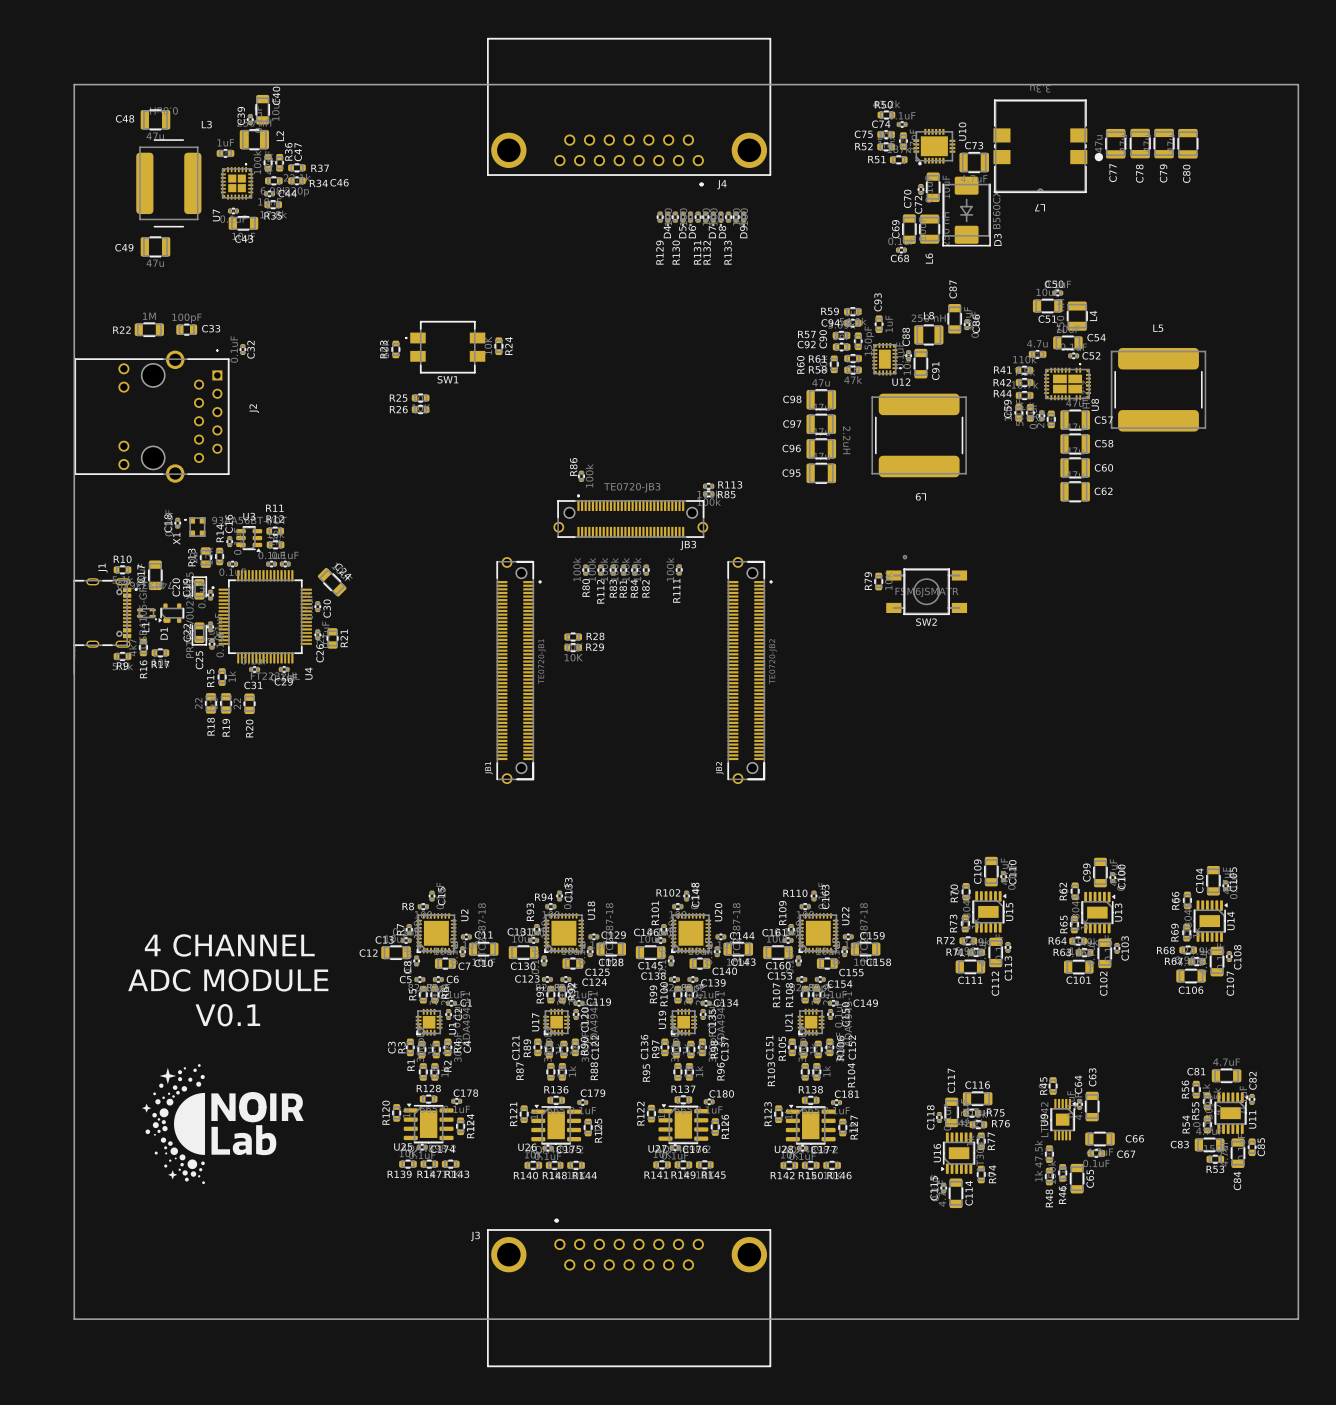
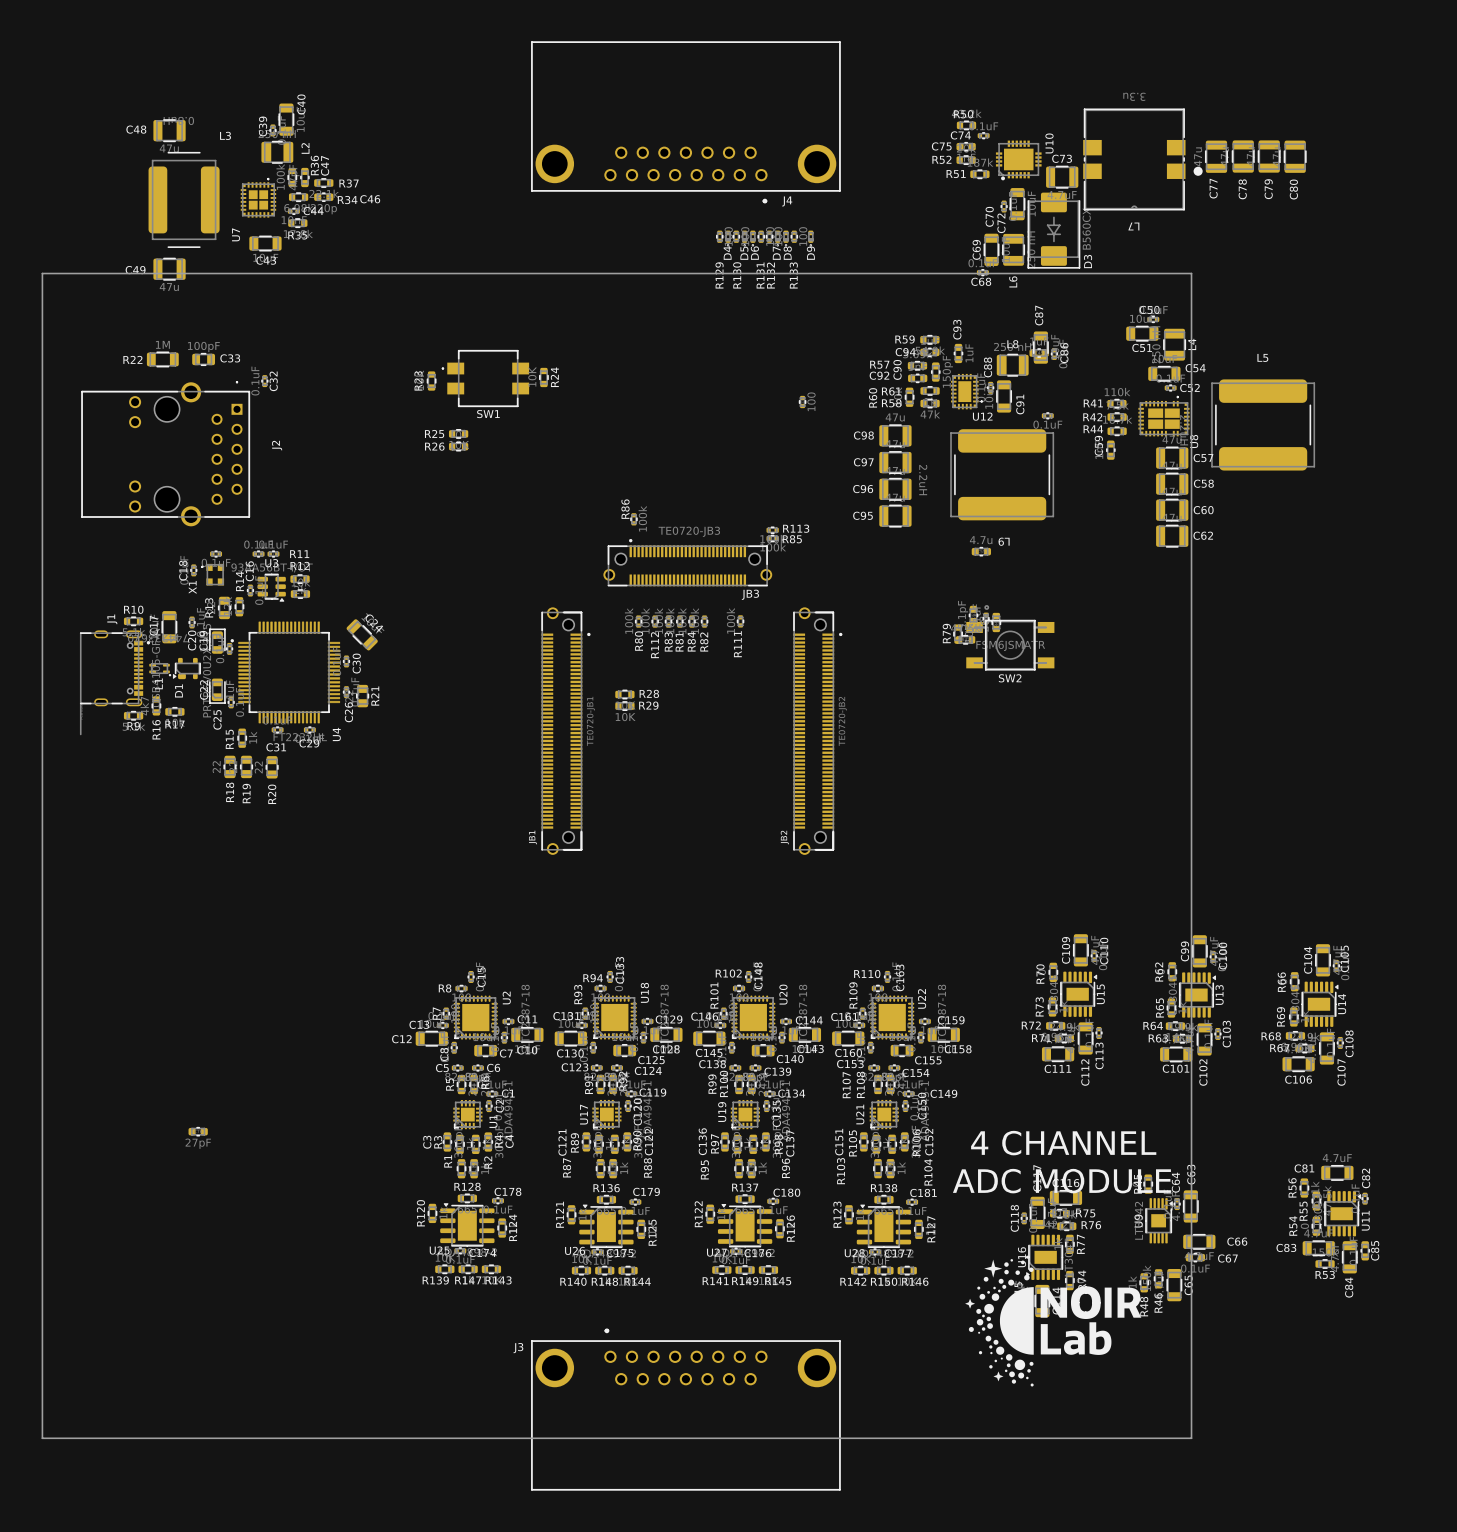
part rotation: 0° (903, 141) -> 90° clockwise (198, 1131)
part position: (903, 141) -> (198, 1131)
part position: (225, 153) -> (1039, 353)
part position: (233, 211) -> (1047, 415)
part position: (736, 217) -> (802, 402)
part position: (1037, 354) -> (981, 551)
part position: (1030, 412) -> (973, 615)
part position: (1041, 415) -> (986, 618)
part position: (1051, 419) -> (996, 622)
part position: (232, 564) -> (216, 554)
part position: (271, 564) -> (258, 554)
part position: (285, 564) -> (273, 554)
part position: (210, 626) -> (192, 622)
text: 4 CHANNEL (229, 945) -> none
text: ADC MODULE (228, 980) -> none
text: V0.1 (227, 1015) -> none
text: none -> 4 CHANNEL (1063, 1143)
drawing: [142, 1064, 304, 1185] -> none
text: none -> ADC MODULE (1062, 1181)
line: (252, 1116) (247, 1113) (246, 1107) (247, 1100) (252, 1098) (257, 1100) (259, 1107) (257, 1113) (252, 1116) -> none
line: (252, 1121) (262, 1117) (265, 1107) (262, 1096) (252, 1092) (243, 1096) (239, 1107) (243, 1117) (252, 1121) -> none
drawing: none -> [965, 1255, 1142, 1387]
part rotation: 0° (1049, 1154) -> 90° clockwise (965, 639)
part position: (1049, 1154) -> (965, 639)
line: none -> (1085, 1312) (1080, 1309) (1078, 1302) (1080, 1295) (1085, 1292) (1091, 1295) (1092, 1302) (1091, 1309) (1085, 1312)
line: none -> (1085, 1318) (1096, 1314) (1099, 1302) (1096, 1291) (1085, 1287) (1075, 1291) (1071, 1302) (1075, 1314) (1085, 1318)
board edge: (74, 1319) (74, 84) (1298, 84) (1298, 1319) (1092, 1319) -> (80, 1438) (42, 1438) (42, 273) (1191, 273) (1191, 1438)

